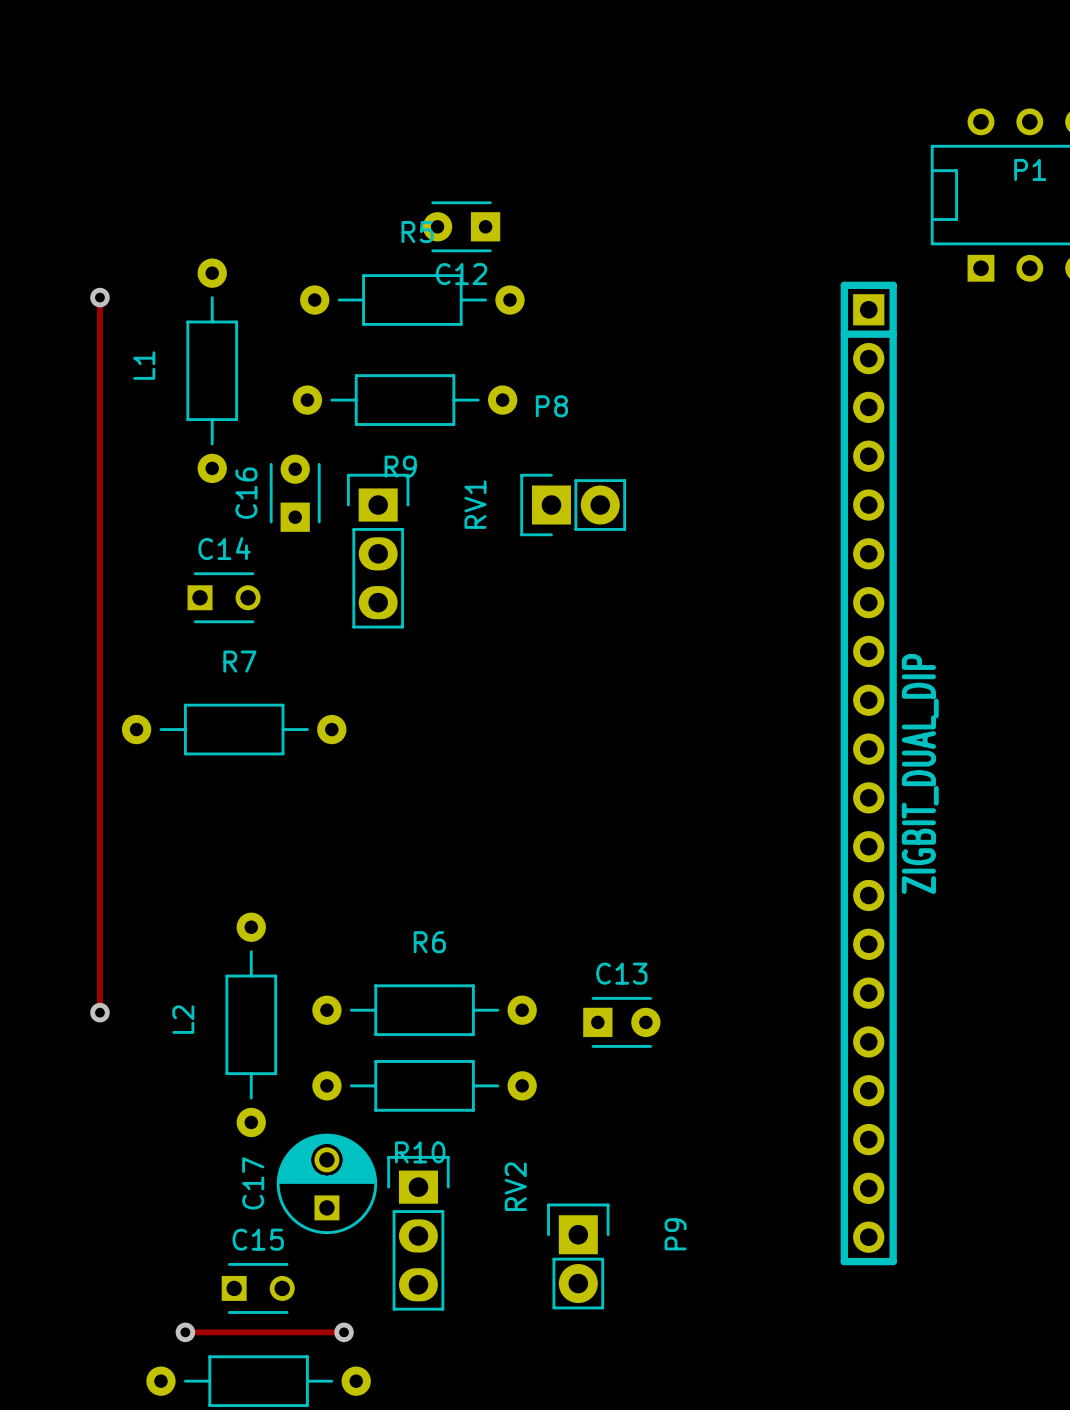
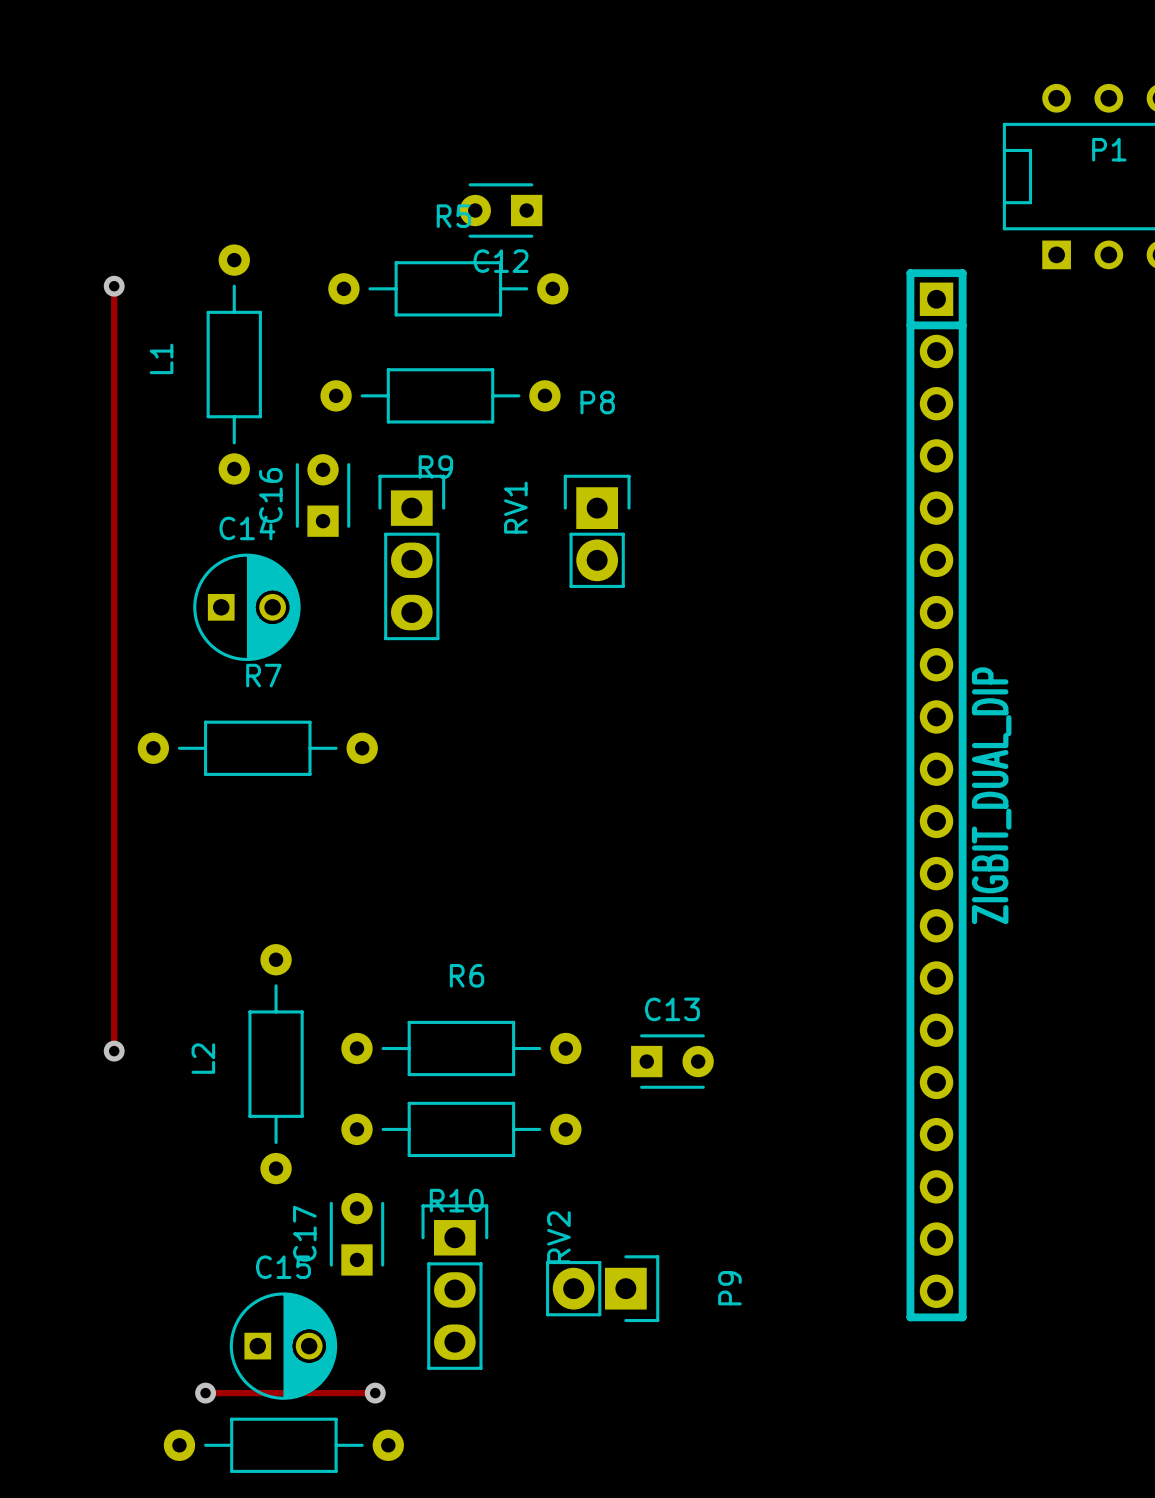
P8 rotation: 0° (573, 505) -> 90° clockwise (597, 531)
C14 footprint: [187, 572, 261, 624] -> [193, 553, 301, 662]
C17 footprint: [276, 1133, 378, 1235] -> [329, 1192, 385, 1276]
P9 rotation: 0° (578, 1256) -> 90° clockwise (602, 1288)
C15 footprint: [221, 1262, 295, 1314] -> [229, 1292, 338, 1400]

